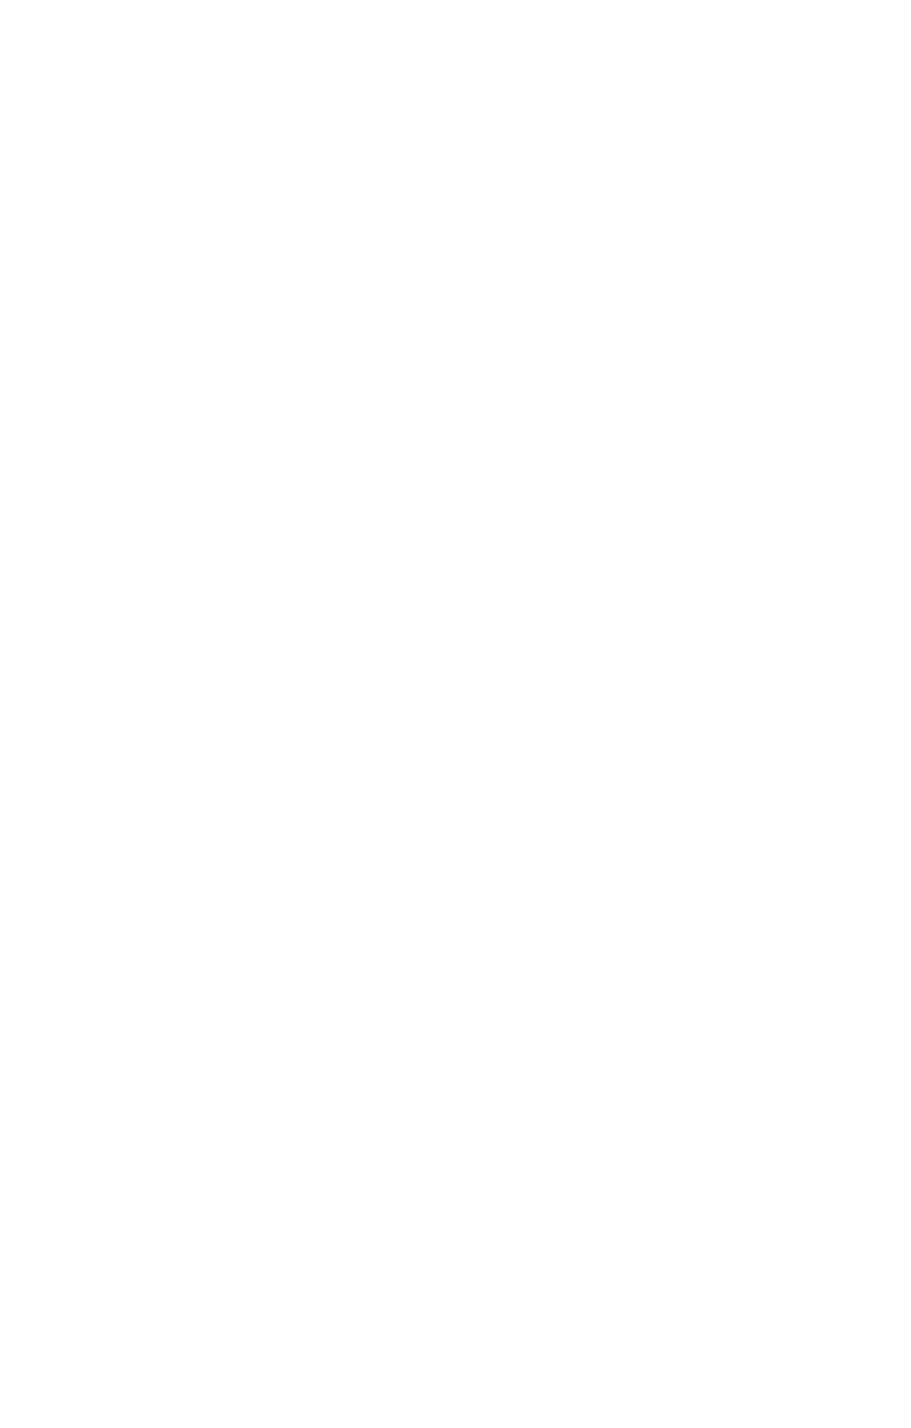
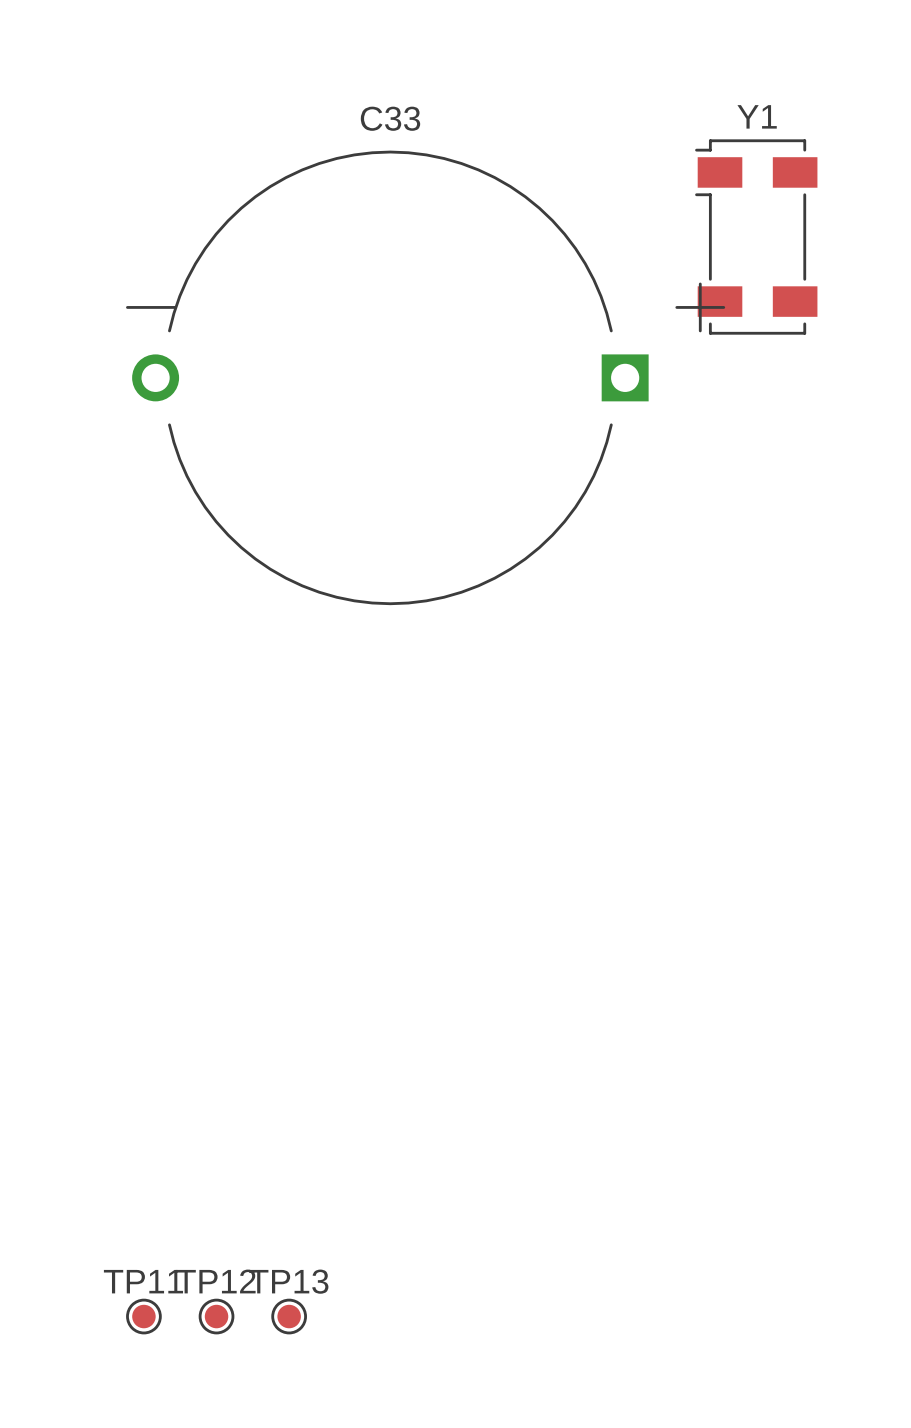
Y1: none -> (756, 237)
C33: none -> (425, 377)
TP11: none -> (143, 1316)
TP12: none -> (216, 1316)
TP13: none -> (289, 1316)

